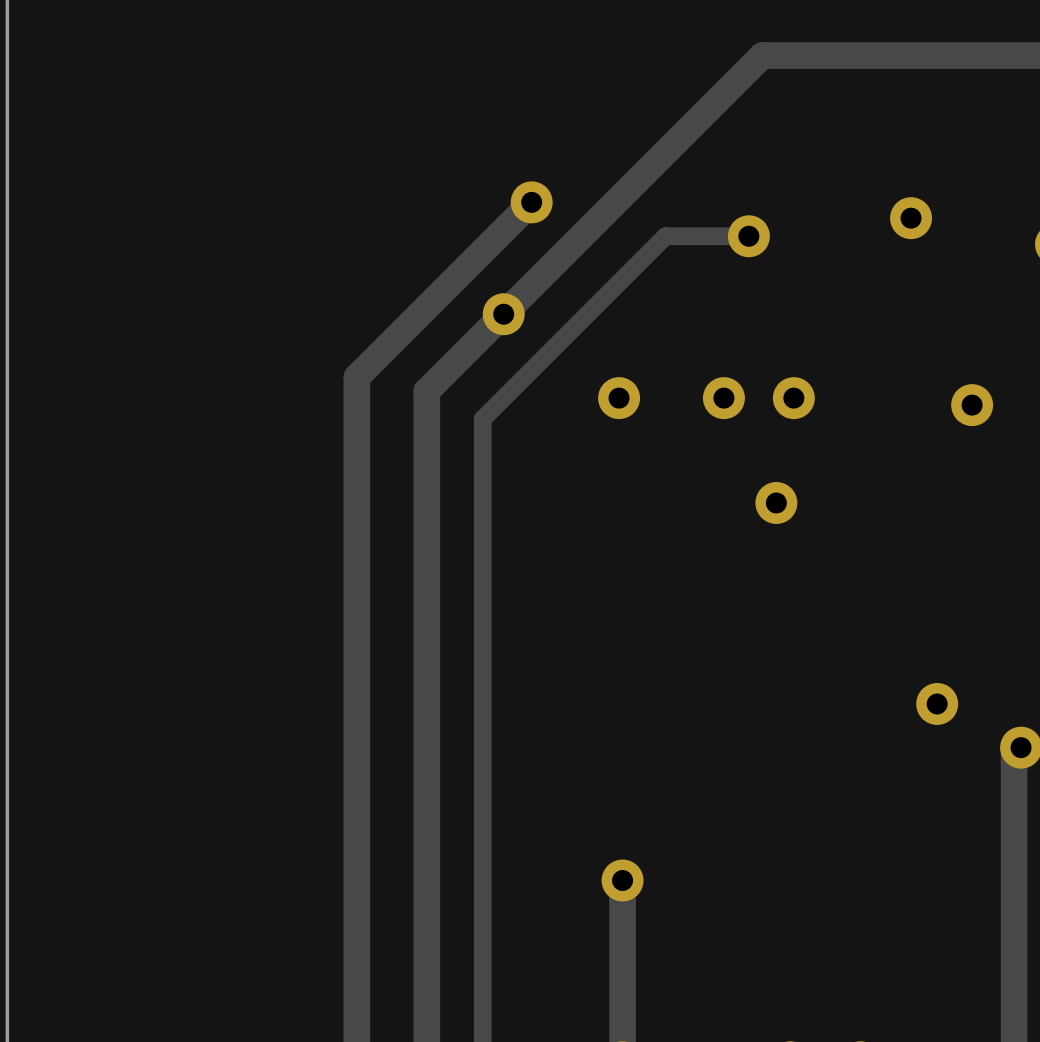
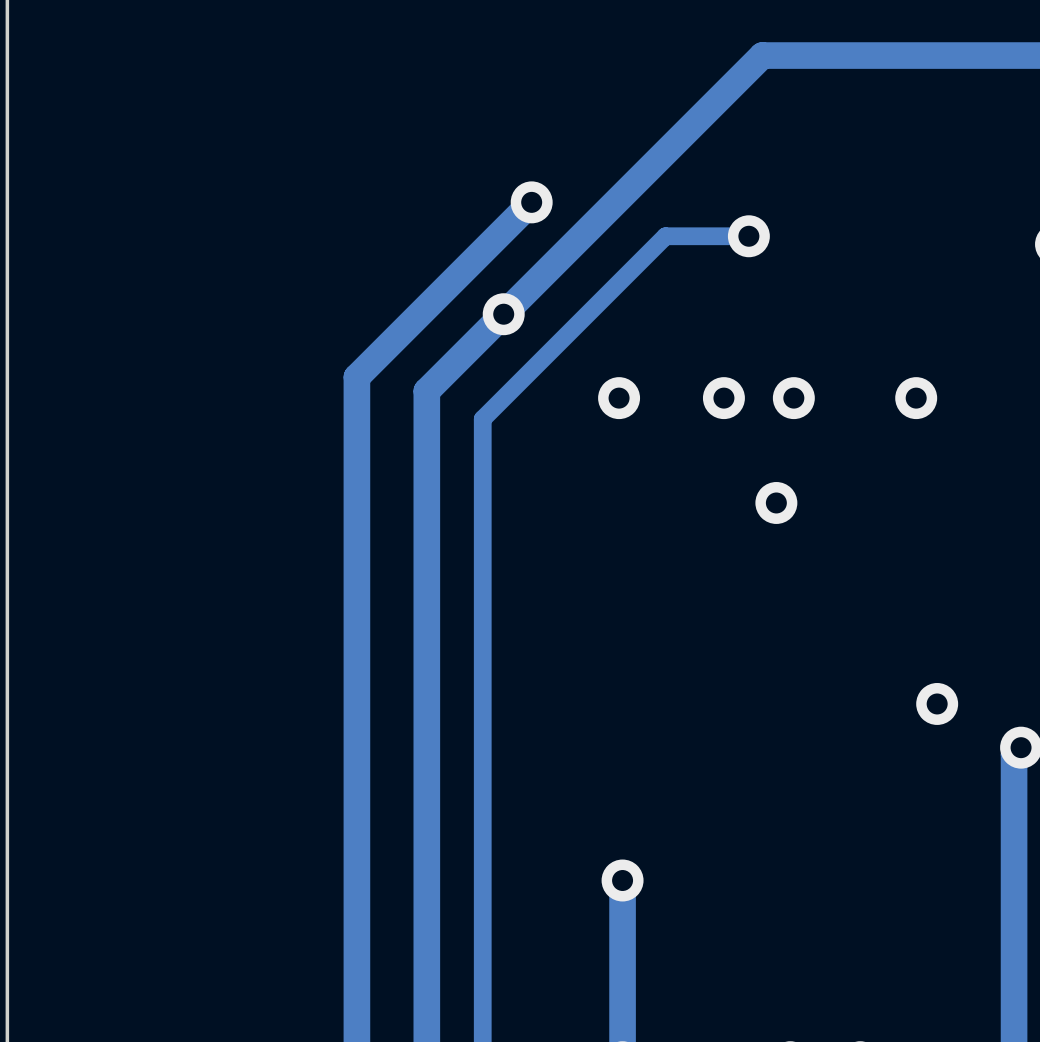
via: (911, 218) -> none
via position: (972, 405) -> (916, 398)

